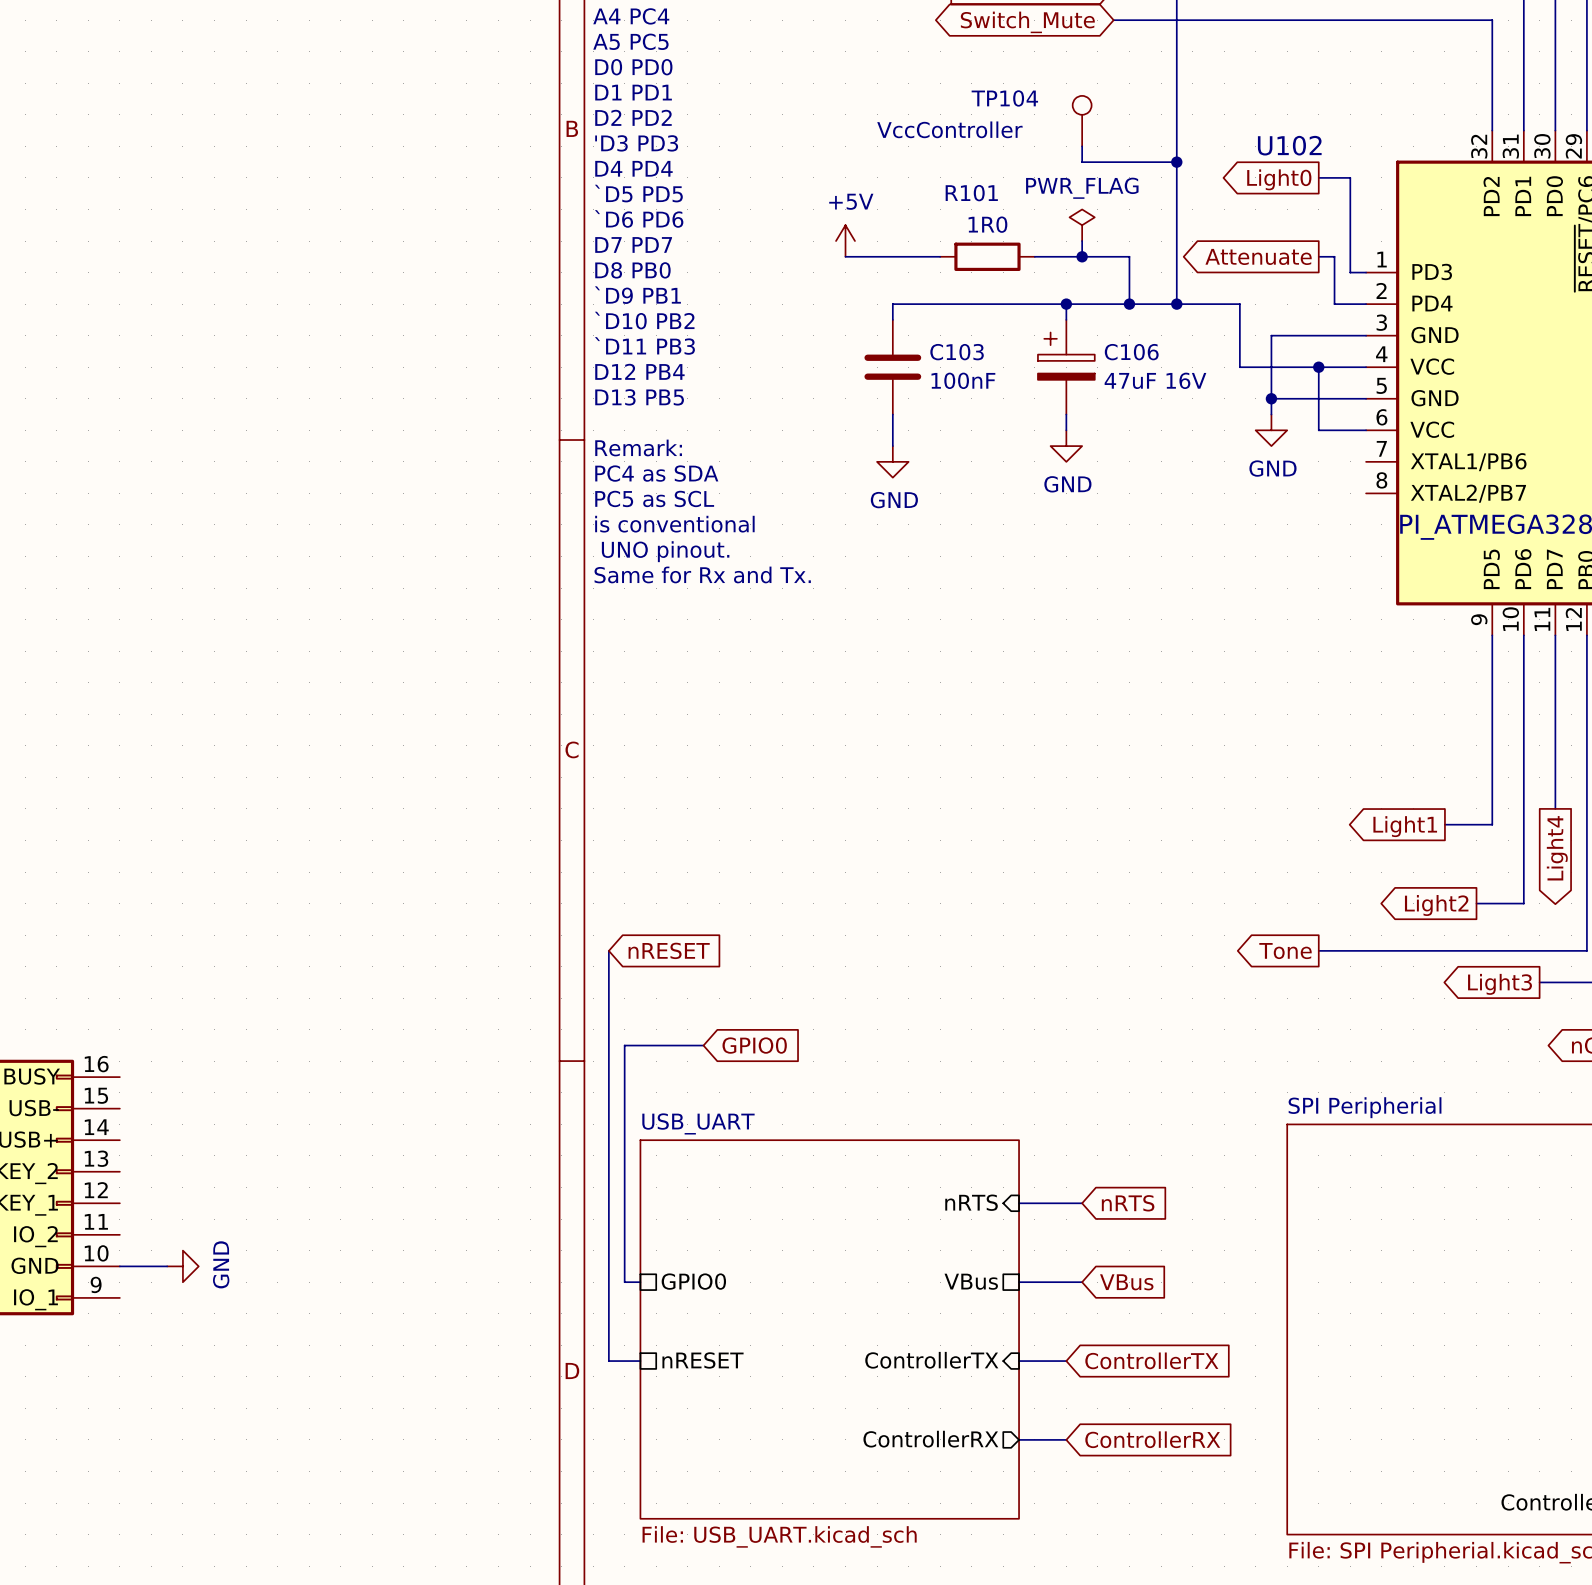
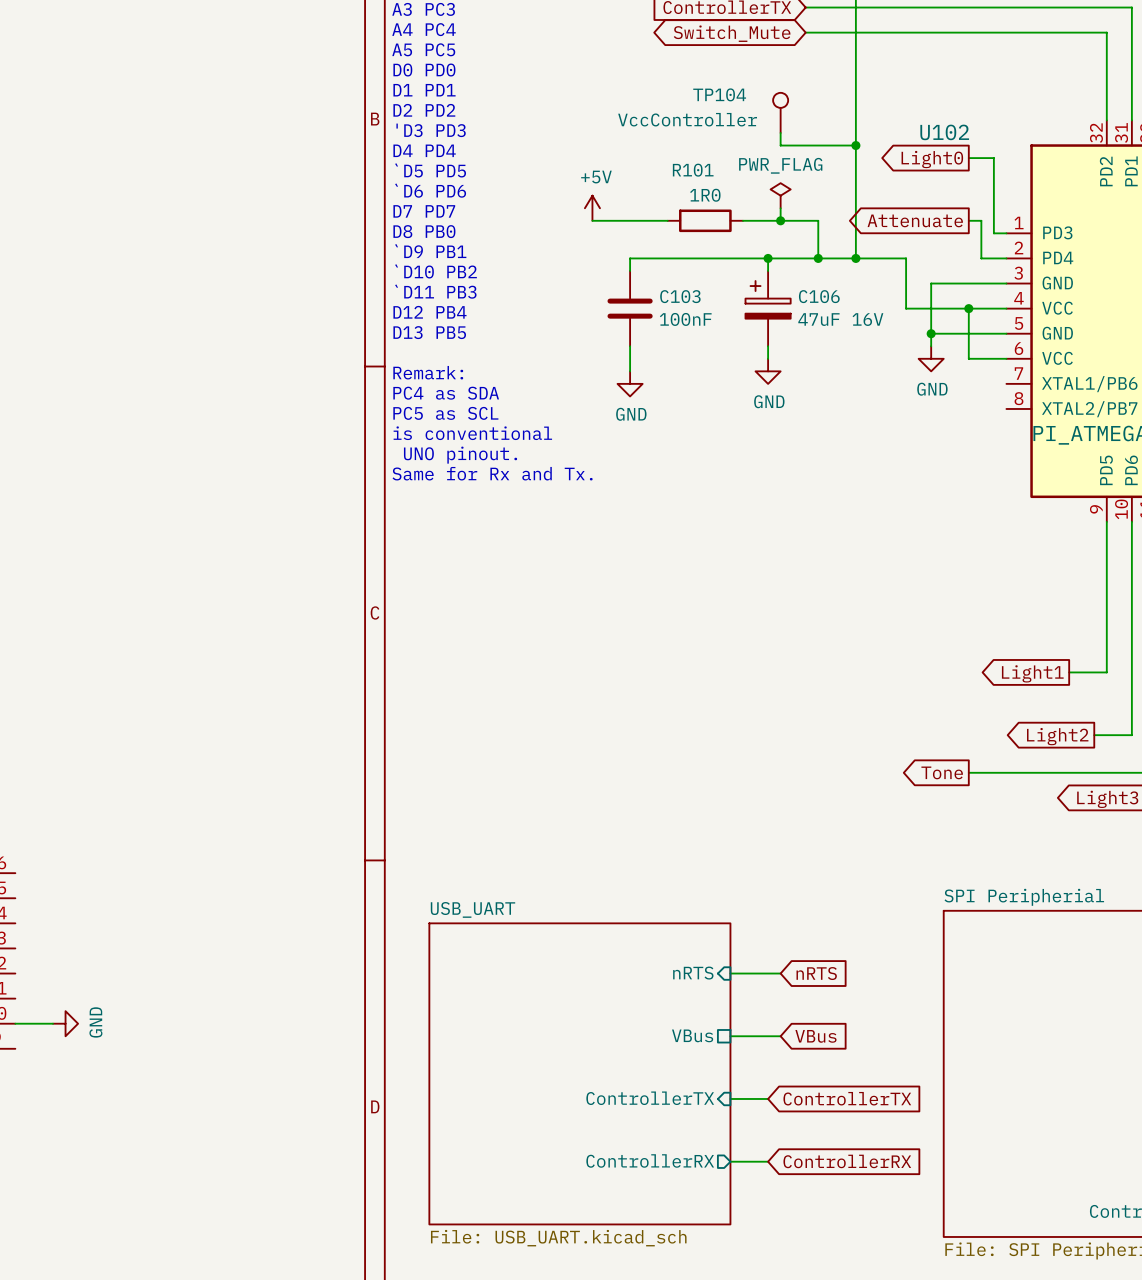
wire: (608, 950) (608, 1361) (640, 1361) -> none
global label: nRESET (669, 950) -> none
wire: (703, 1045) (624, 1045) (624, 1282) (640, 1282) -> none
global label: GPIO0 (754, 1045) -> none
sheet pin: GPIO0 (693, 1281) -> none
sheet pin: nRESET (703, 1360) -> none

